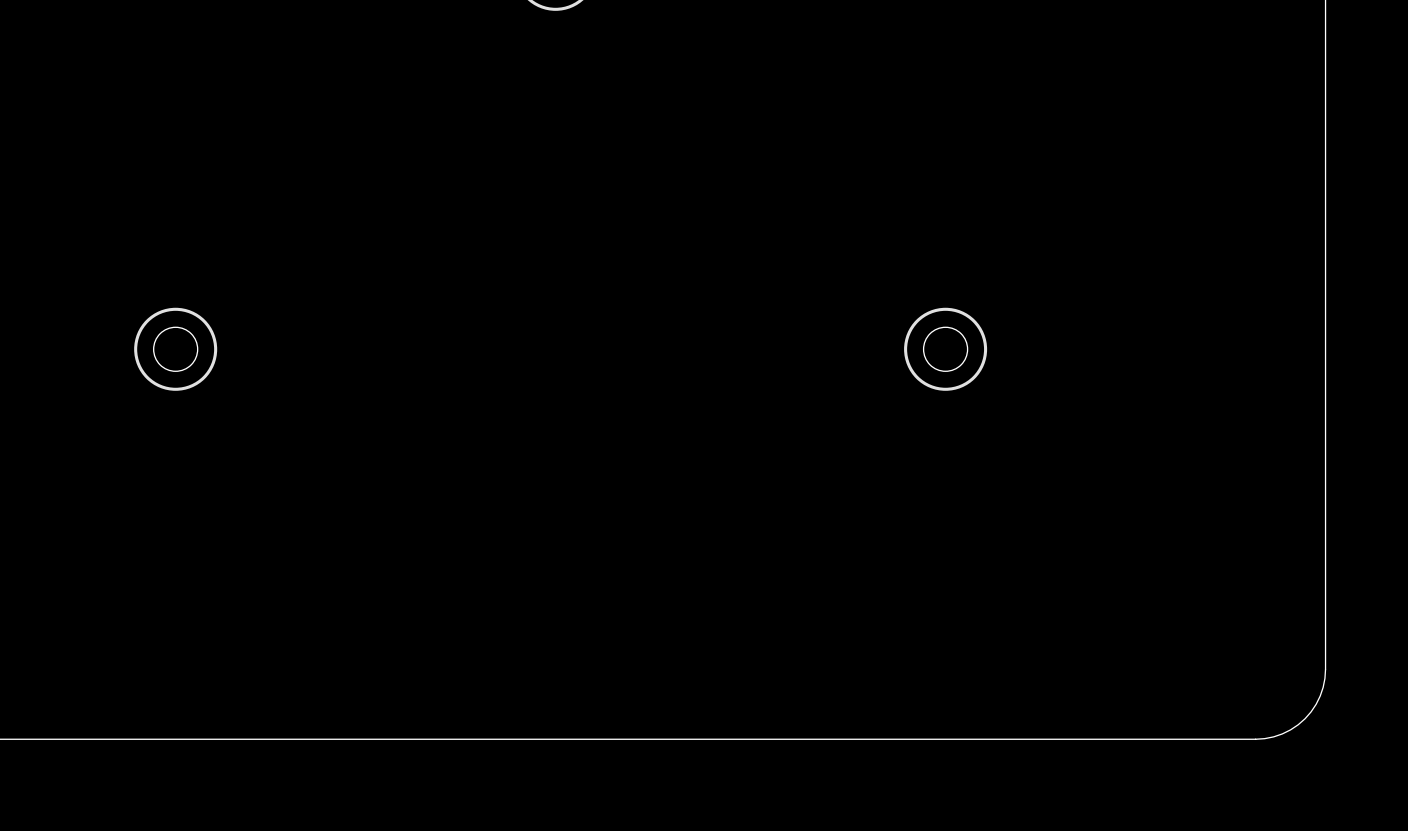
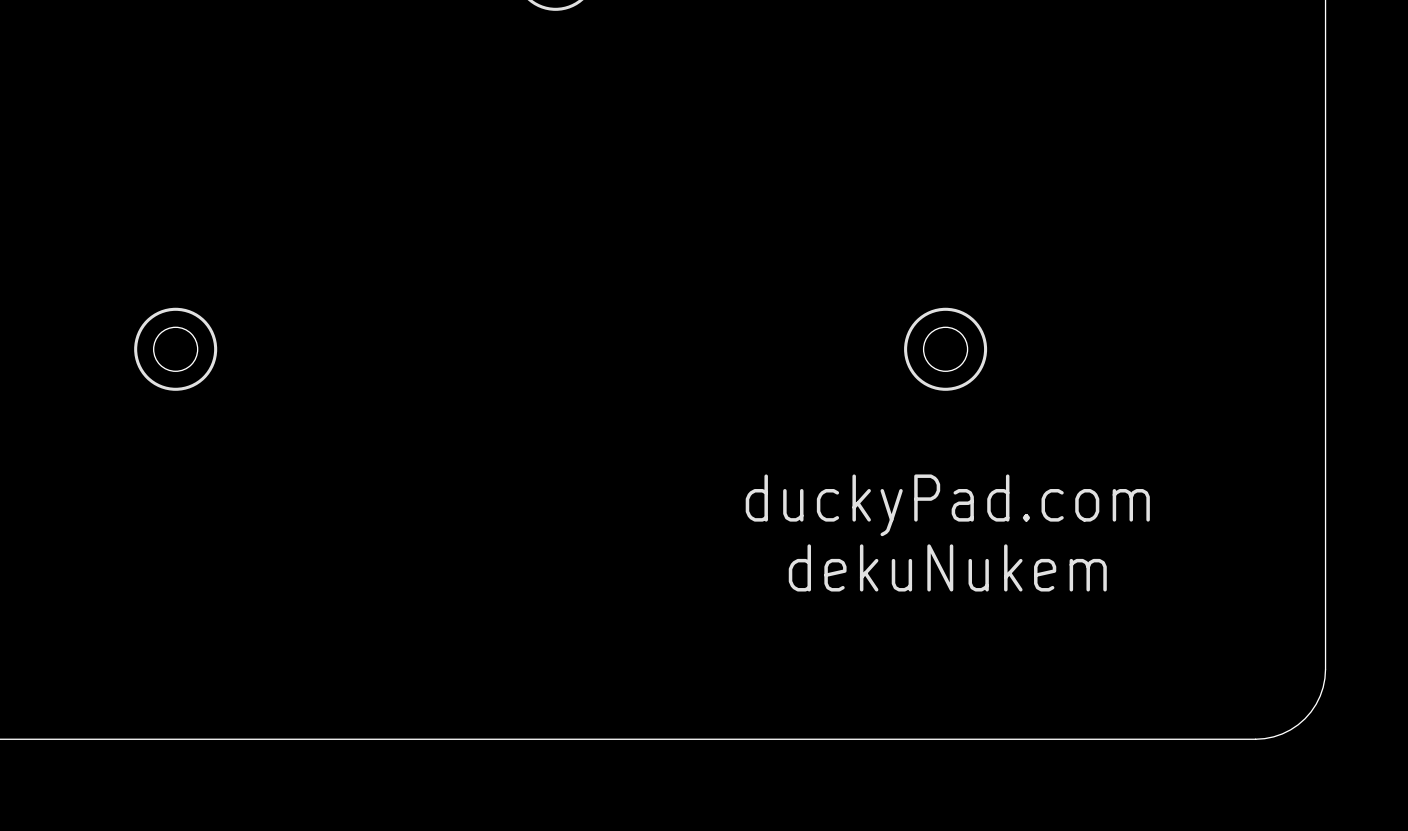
text: none -> duckyPad.com (947, 505)
text: none -> dekuNukem (947, 567)

